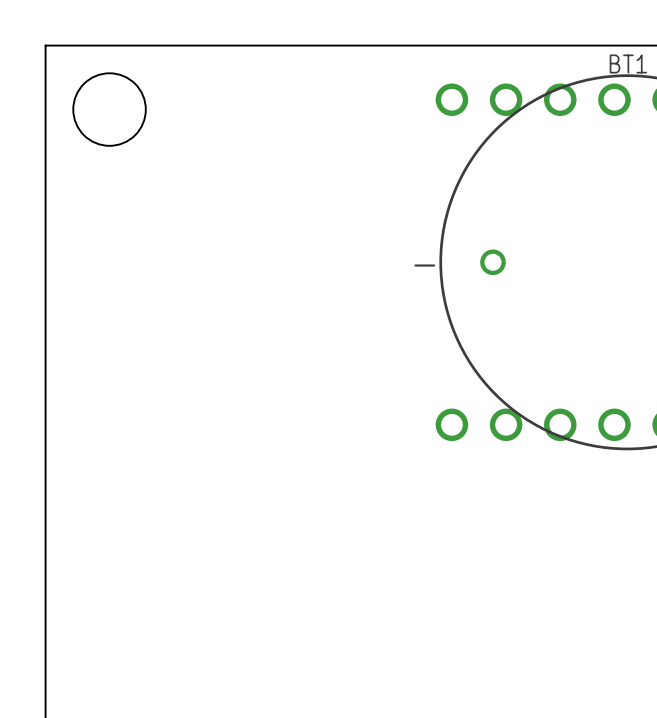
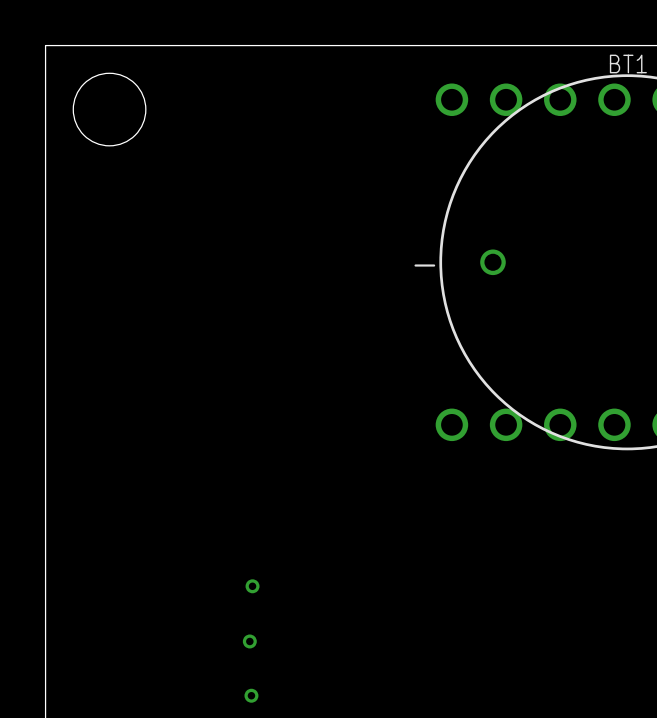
via: none -> (252, 586)
via: none -> (249, 641)
via: none -> (251, 695)

